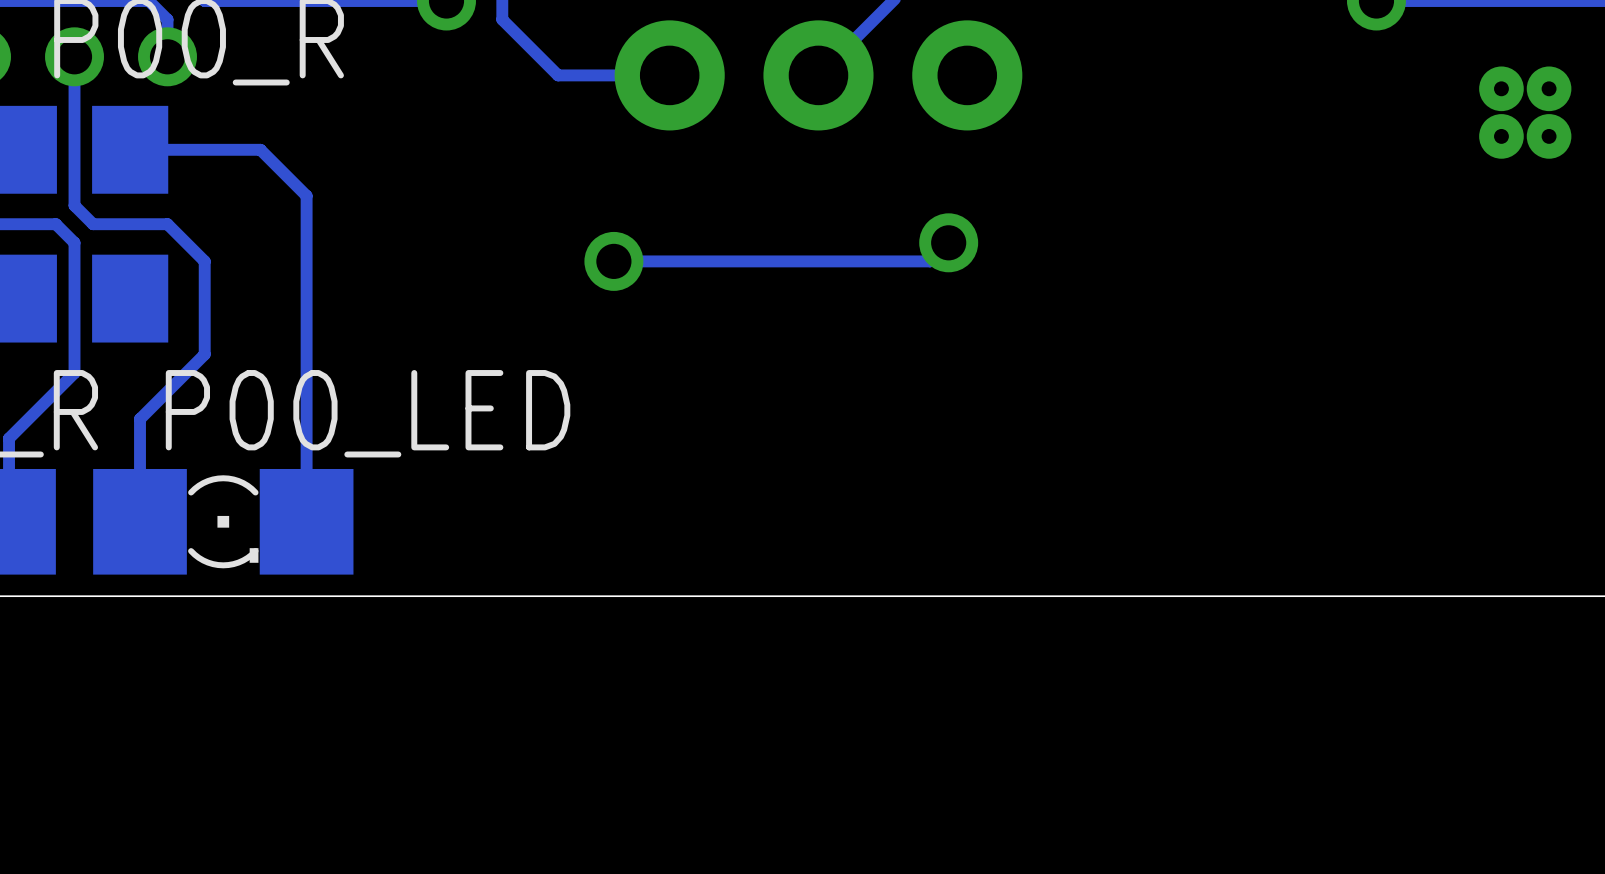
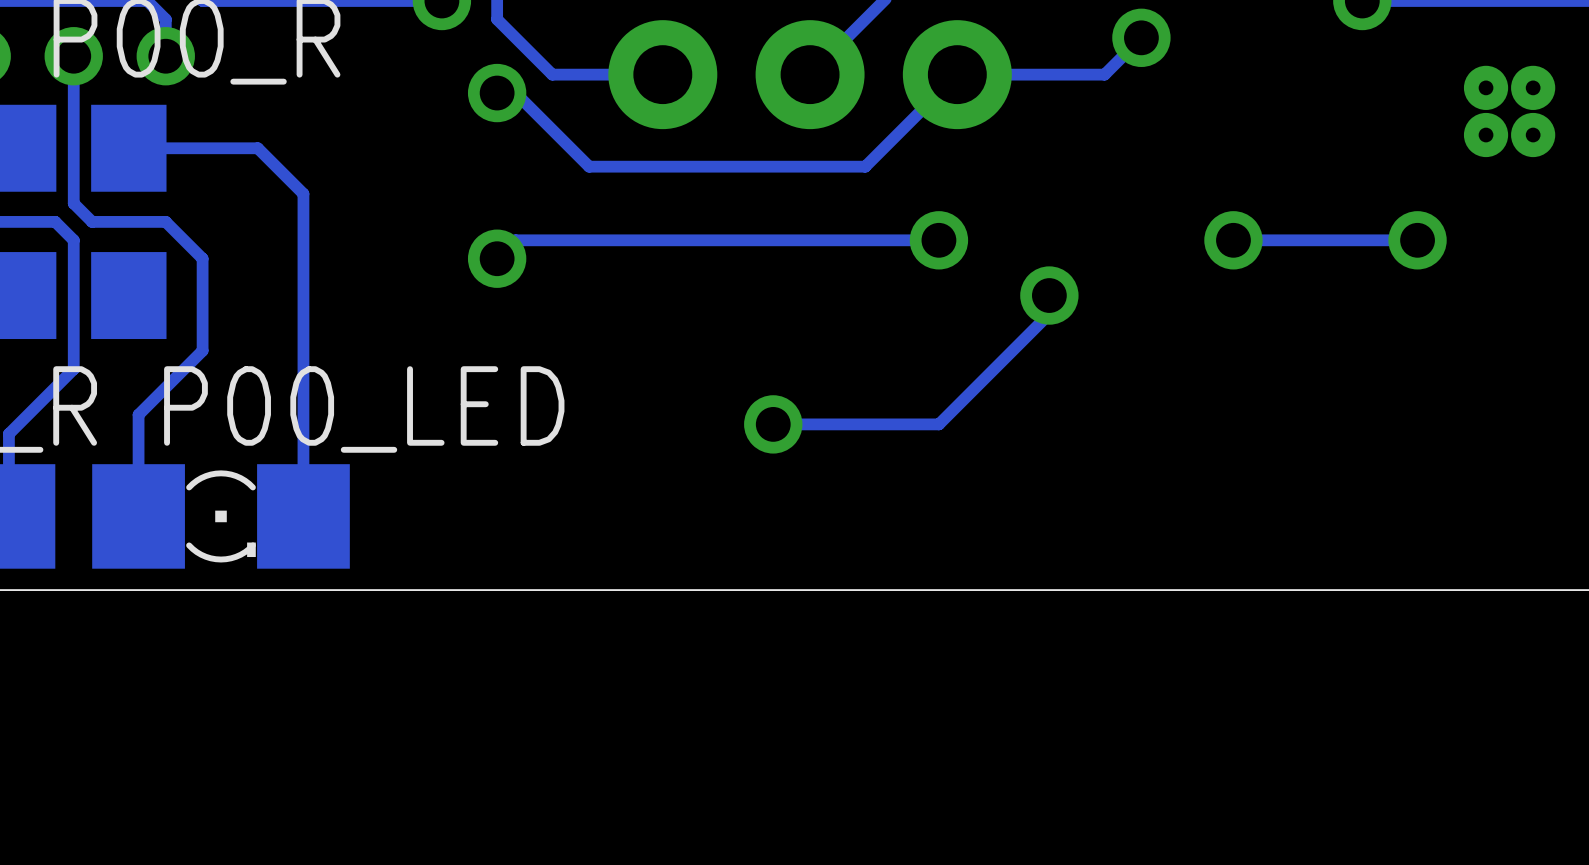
track: none -> (1141, 37) (1104, 74) (957, 74) (865, 166) (589, 166) (515, 93) (497, 93)
via: none -> (1141, 37)
via: none -> (497, 93)
track: (948, 242) (930, 261) (613, 261) -> (938, 240) (515, 240) (497, 258)
via: none -> (1233, 240)
track: none -> (1417, 240) (1233, 240)
via: none -> (1417, 240)
via: none -> (497, 258)
via: (613, 261) -> none
track: none -> (1049, 295) (1049, 313) (938, 424) (773, 424)
via: none -> (1049, 295)
via: none -> (773, 424)

